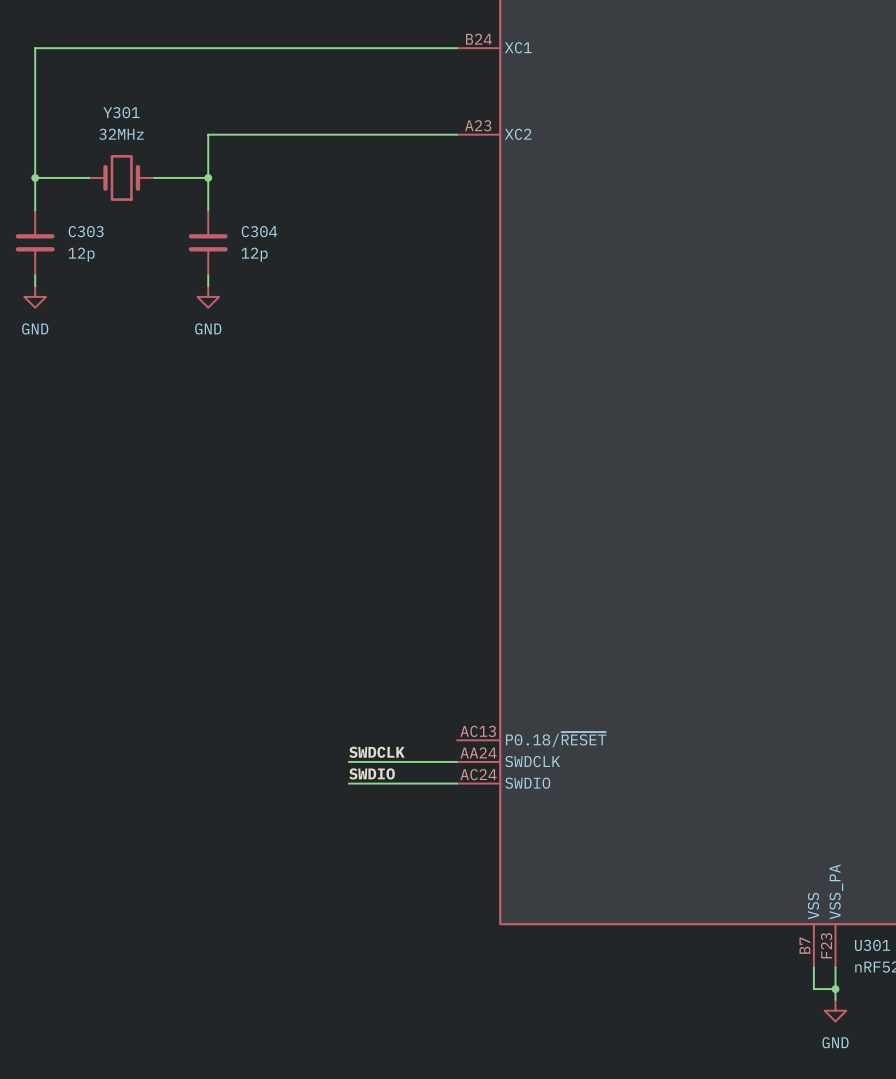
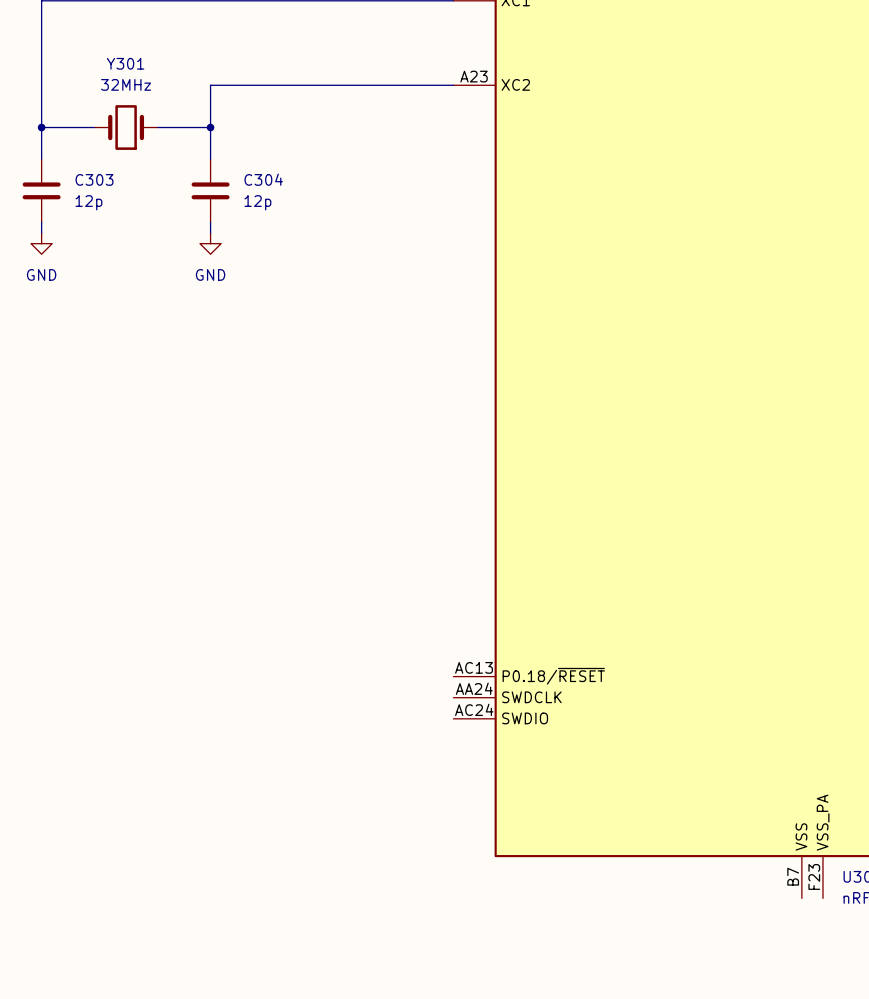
label: SWDCLK (376, 752) -> none
wire: (348, 761) (456, 761) -> none
label: SWDIO (372, 773) -> none
wire: (348, 783) (456, 783) -> none
wire: (813, 967) (813, 989) (835, 989) -> none
wire: (835, 967) (835, 999) -> none
junction: (835, 989) -> none
power symbol: GND (835, 1010) -> none

